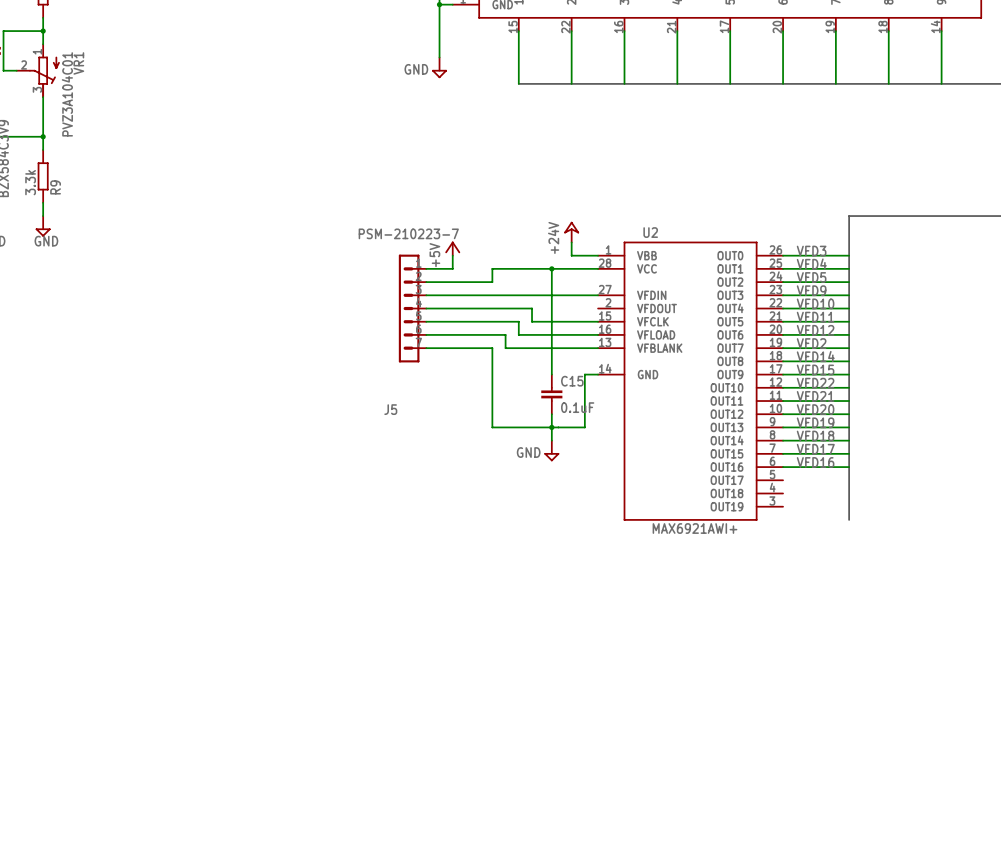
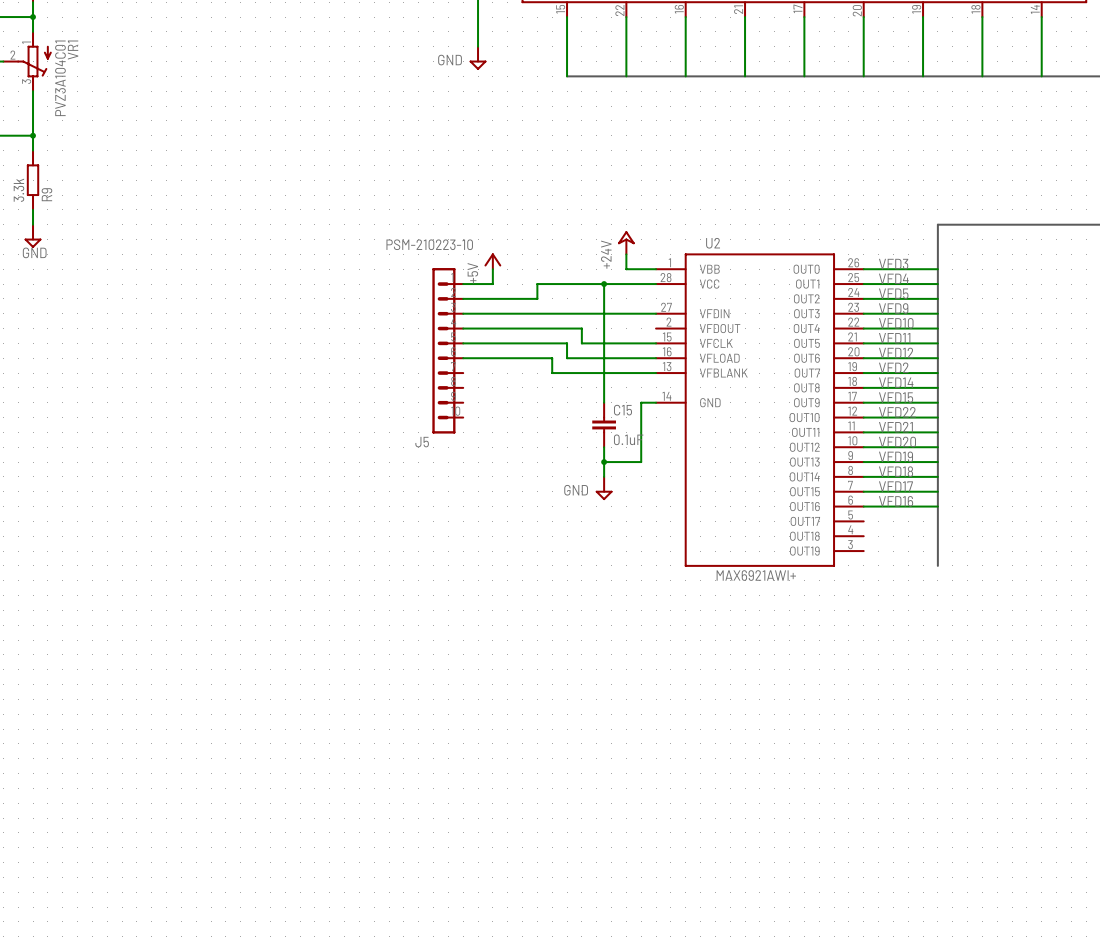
J5 value: PSM-210223-7 (408, 233) -> PSM-210223-10 (429, 244)
J5 symbol: [398, 254, 427, 363] -> [432, 268, 464, 434]
wire: (426, 348) (492, 348) (492, 427) (551, 427) -> none

